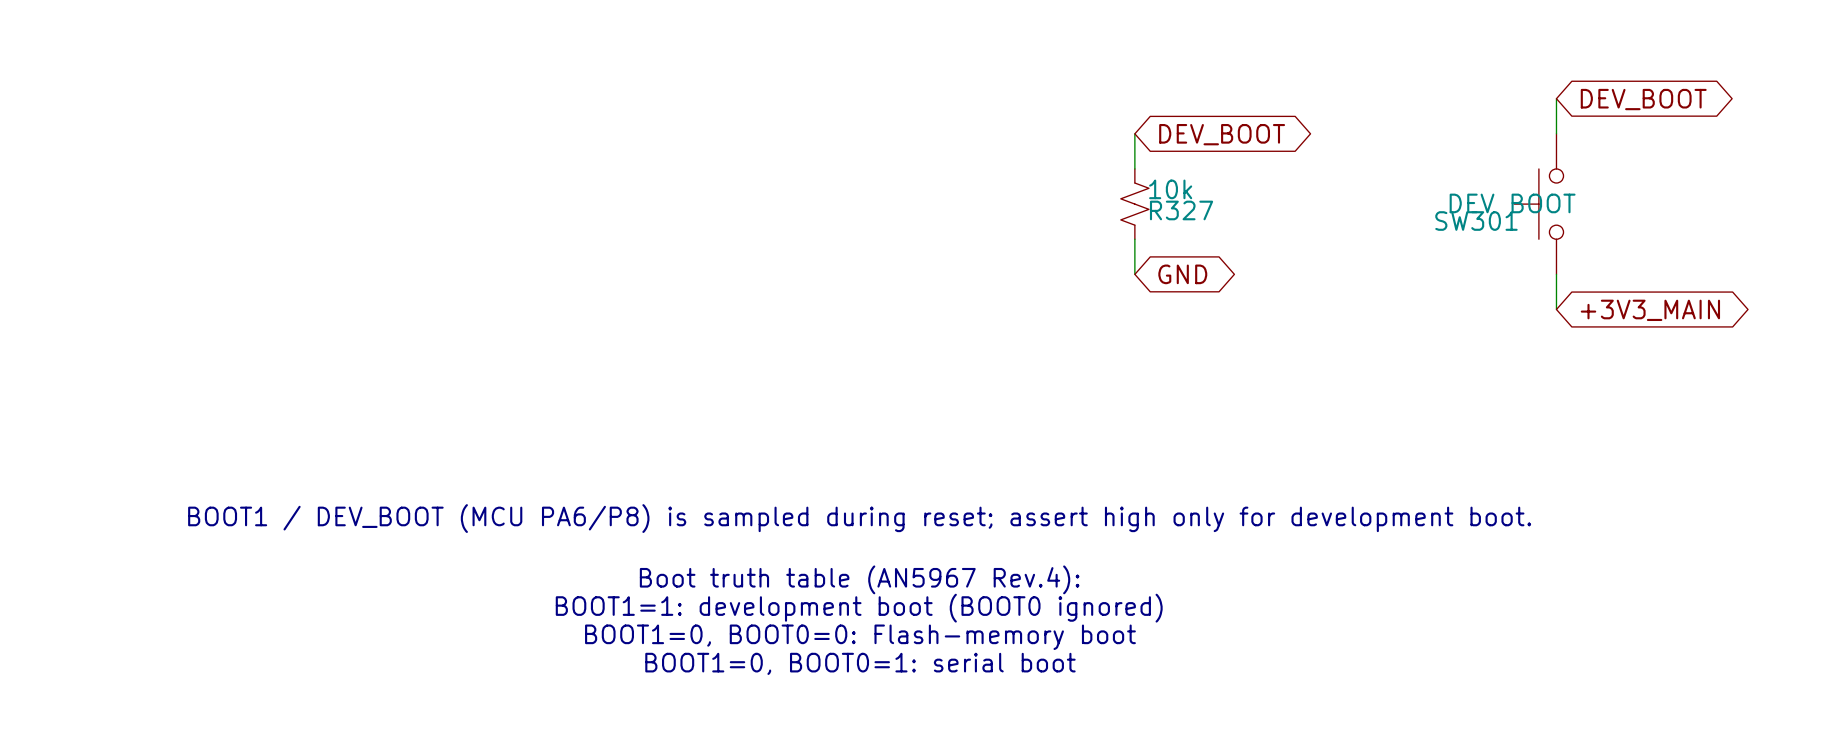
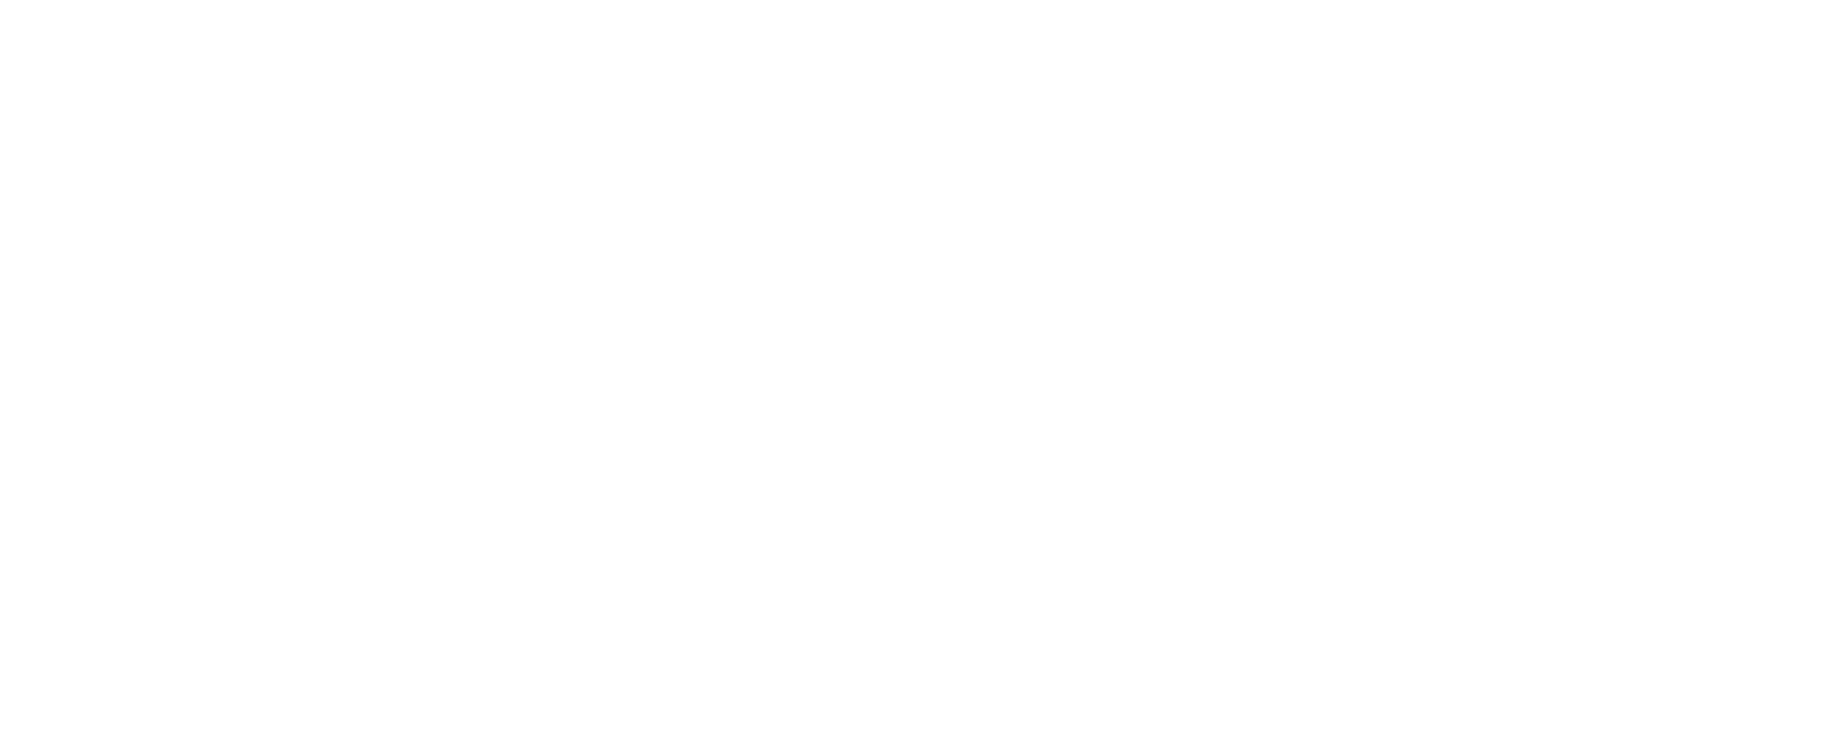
wire: (1556, 98) (1556, 133) -> none
global label: DEV_BOOT (1643, 99) -> none
wire: (1134, 133) (1134, 168) -> none
global label: DEV_BOOT (1222, 134) -> none
R327: 10k (1134, 204) -> none
SW301: DEV BOOT (1538, 204) -> none
wire: (1134, 239) (1134, 274) -> none
global label: GND (1182, 274) -> none
wire: (1556, 274) (1556, 309) -> none
global label: +3V3_MAIN (1650, 310) -> none
text: BOOT1 / DEV_BOOT (MCU PA6/P8) is sampled during reset; assert high only for development boot. (859, 518) -> none
text: Boot truth table (AN5967 Rev.4): (859, 579) -> none
text: BOOT1=1: development boot (BOOT0 ignored) (859, 608) -> none
text: BOOT1=0, BOOT0=0: Flash-memory boot (860, 637) -> none
text: BOOT1=0, BOOT0=1: serial boot (860, 663) -> none

